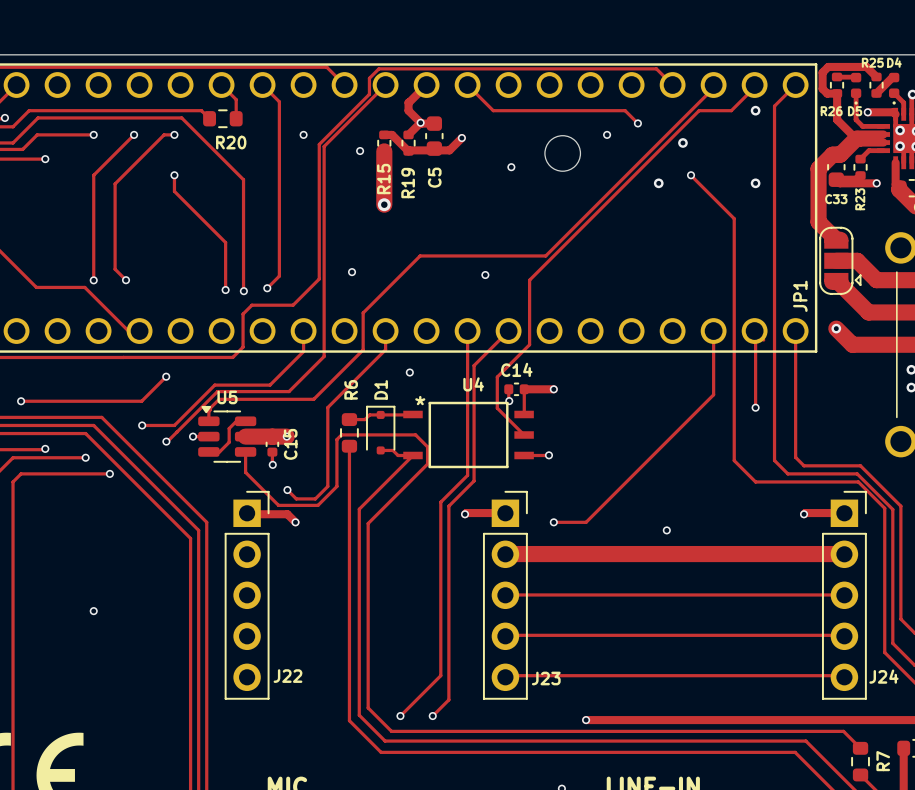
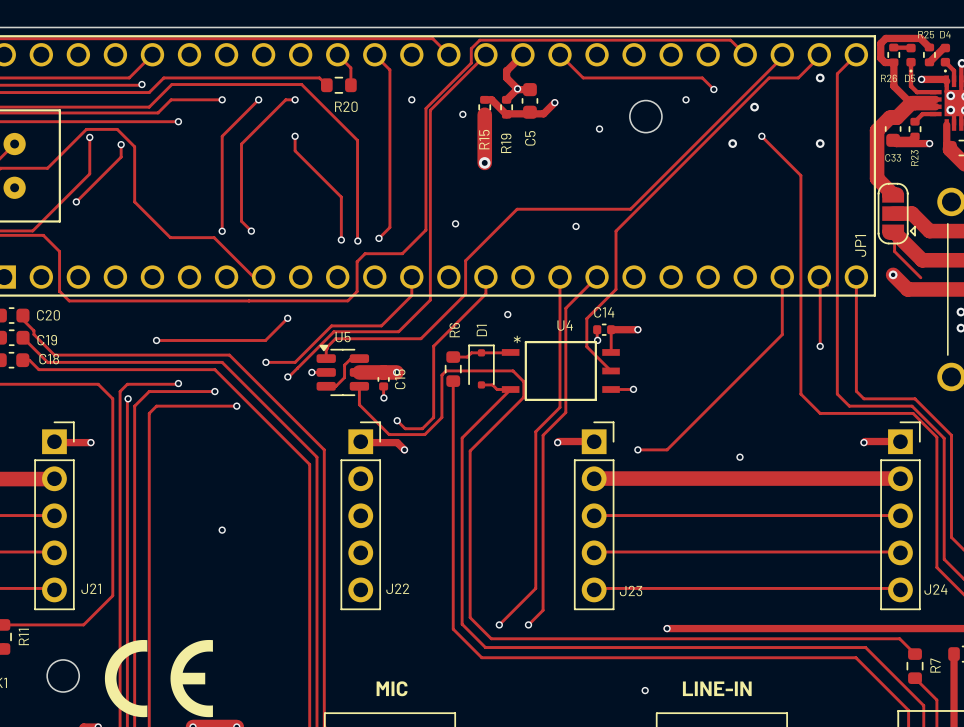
track: none -> (894, 232) (894, 251) (920, 277)

